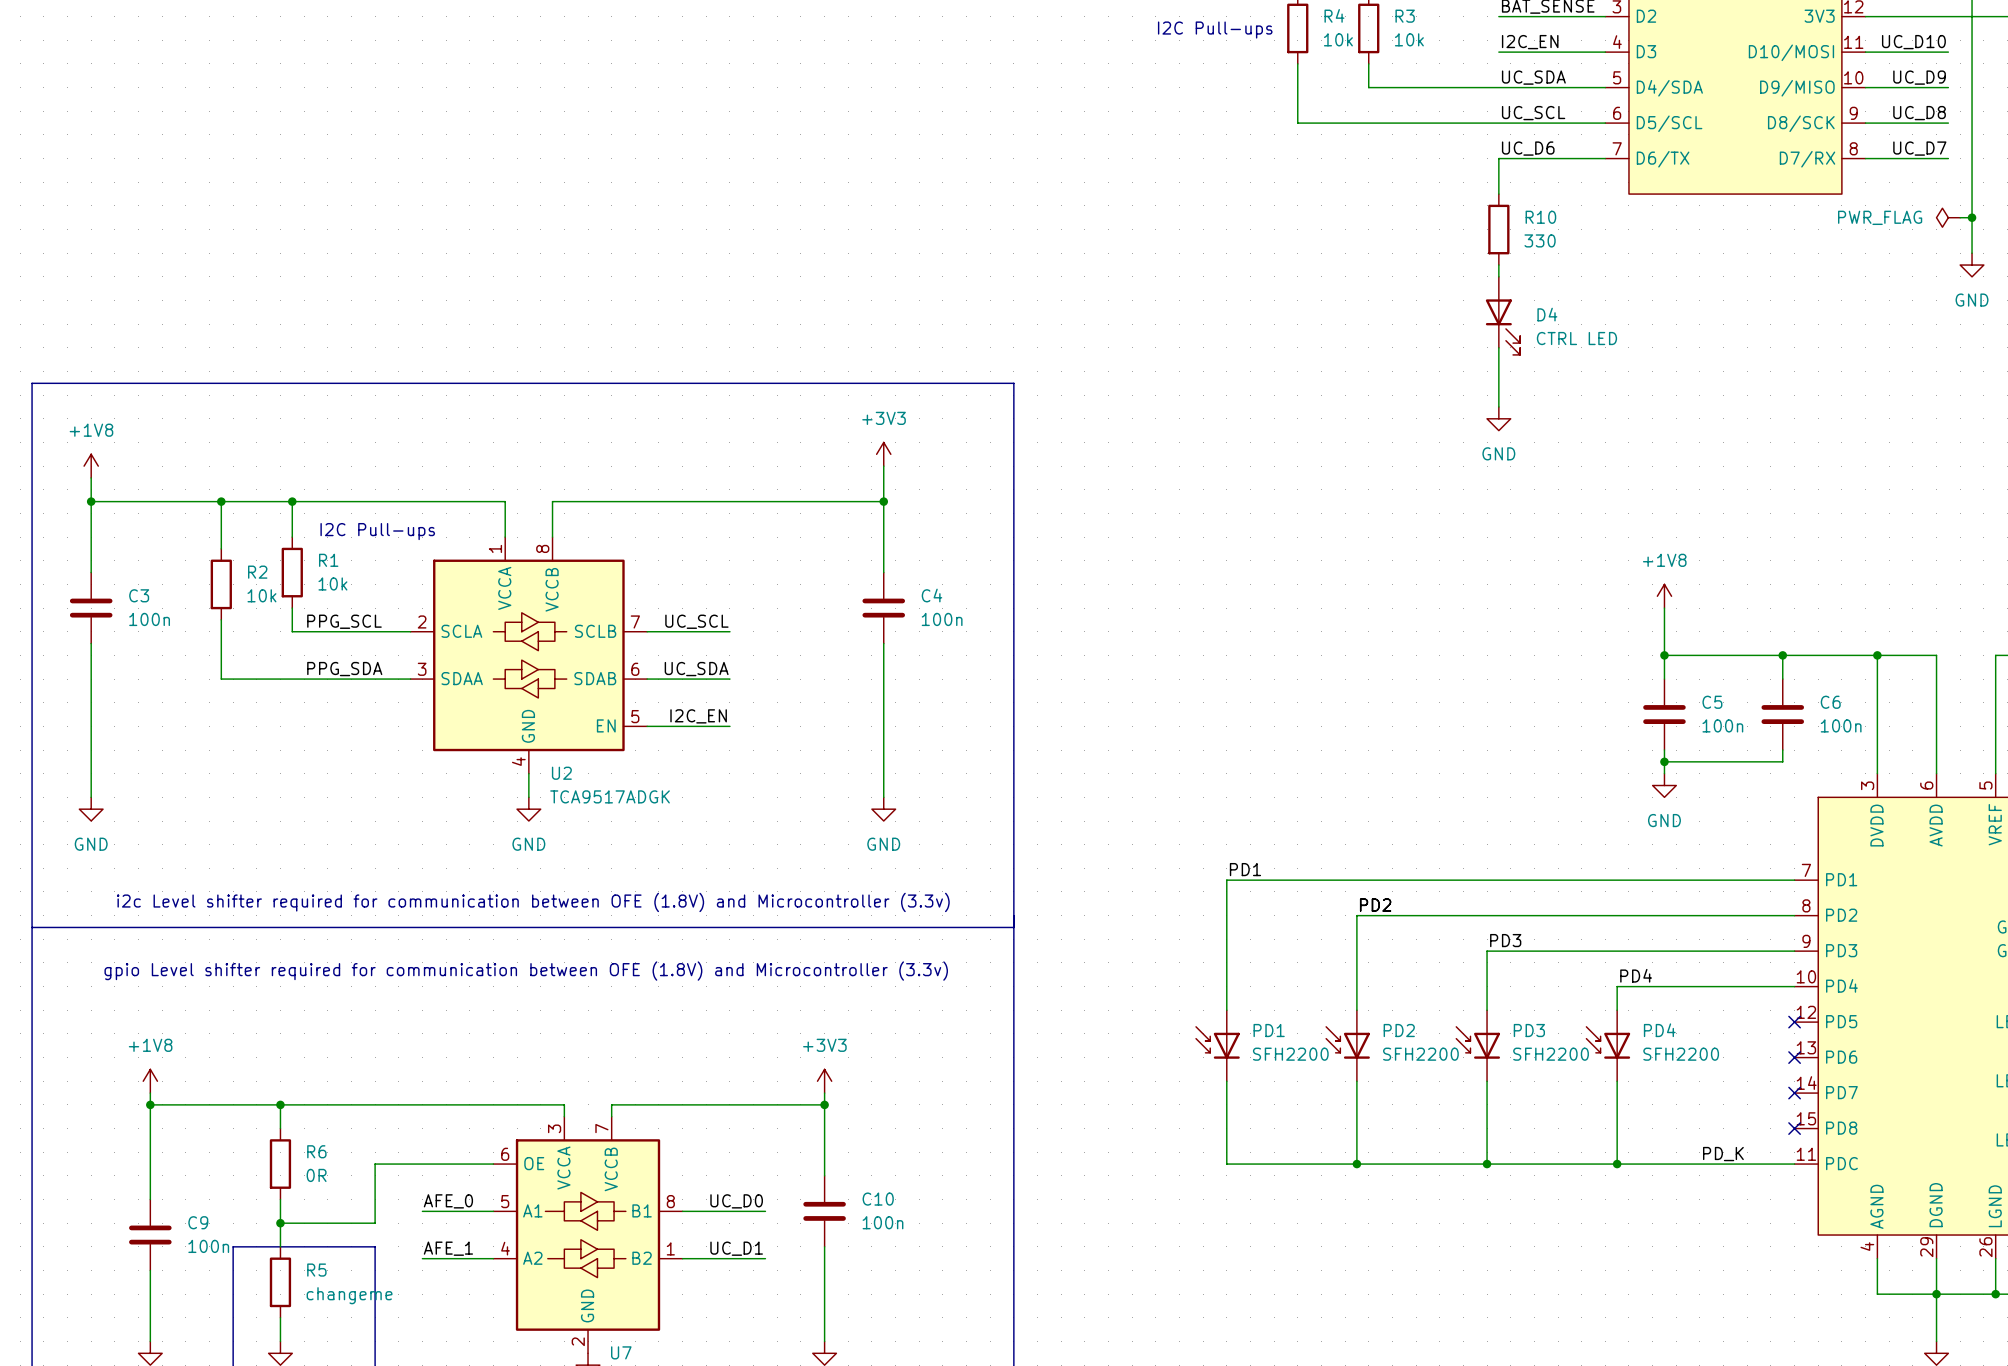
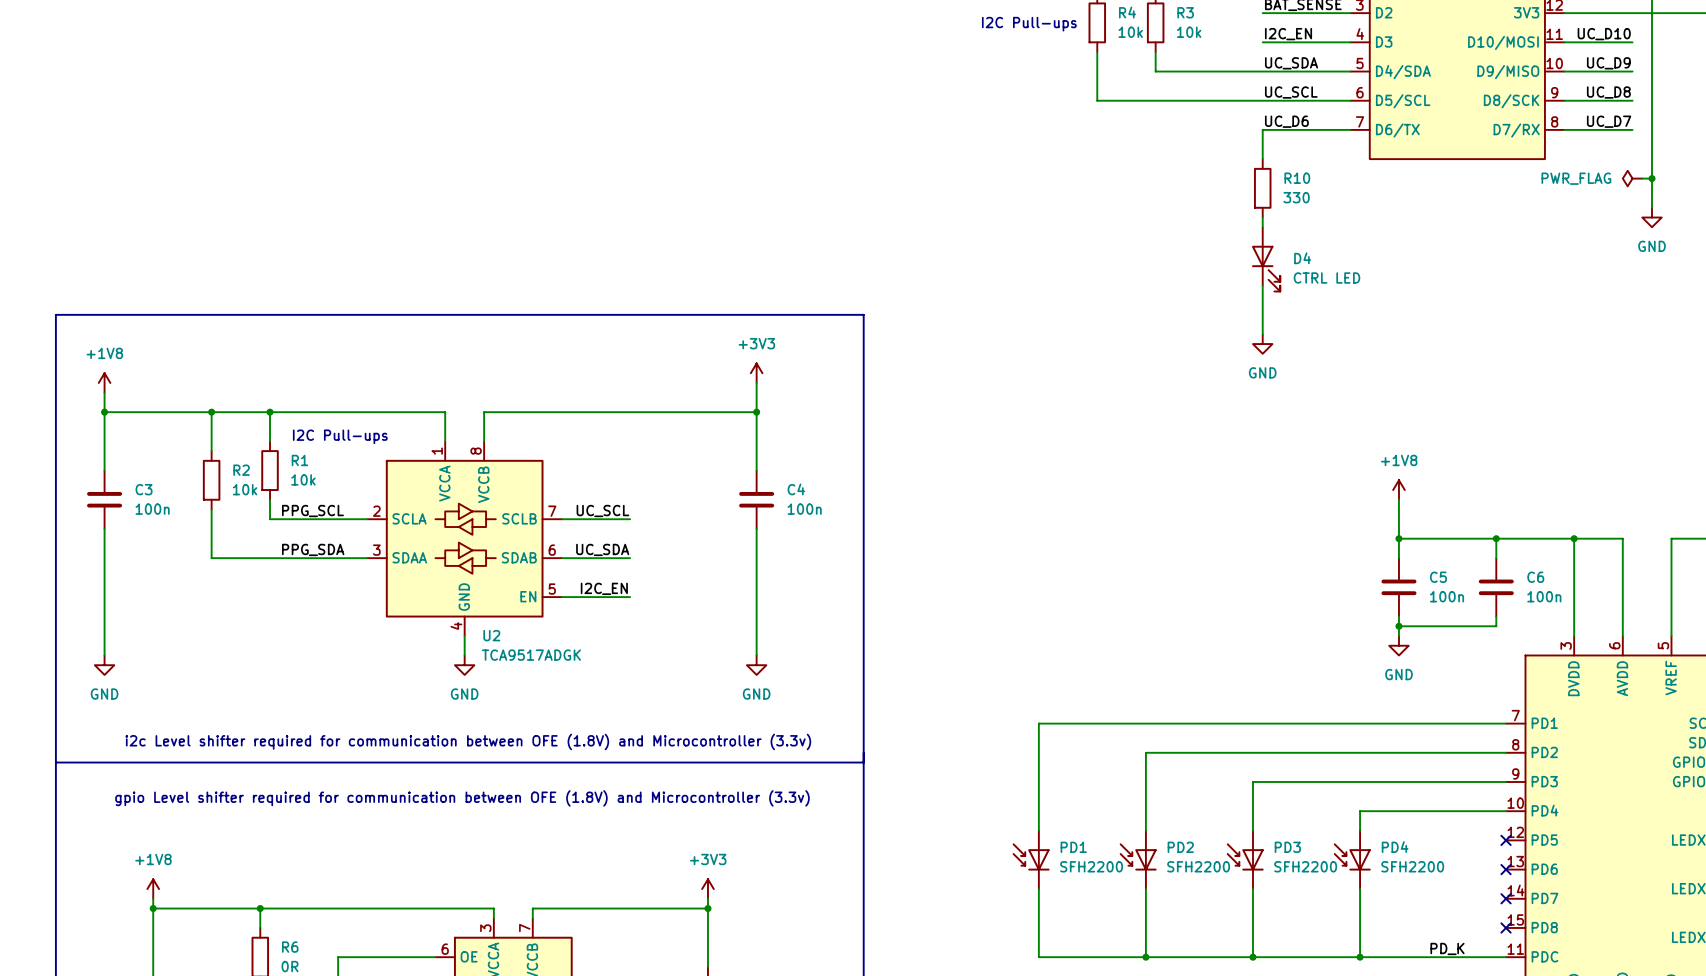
label: PD1 (1245, 869) -> none
label: PD2 (1375, 905) -> none
label: PD3 (1505, 940) -> none
label: PD4 (1636, 975) -> none

